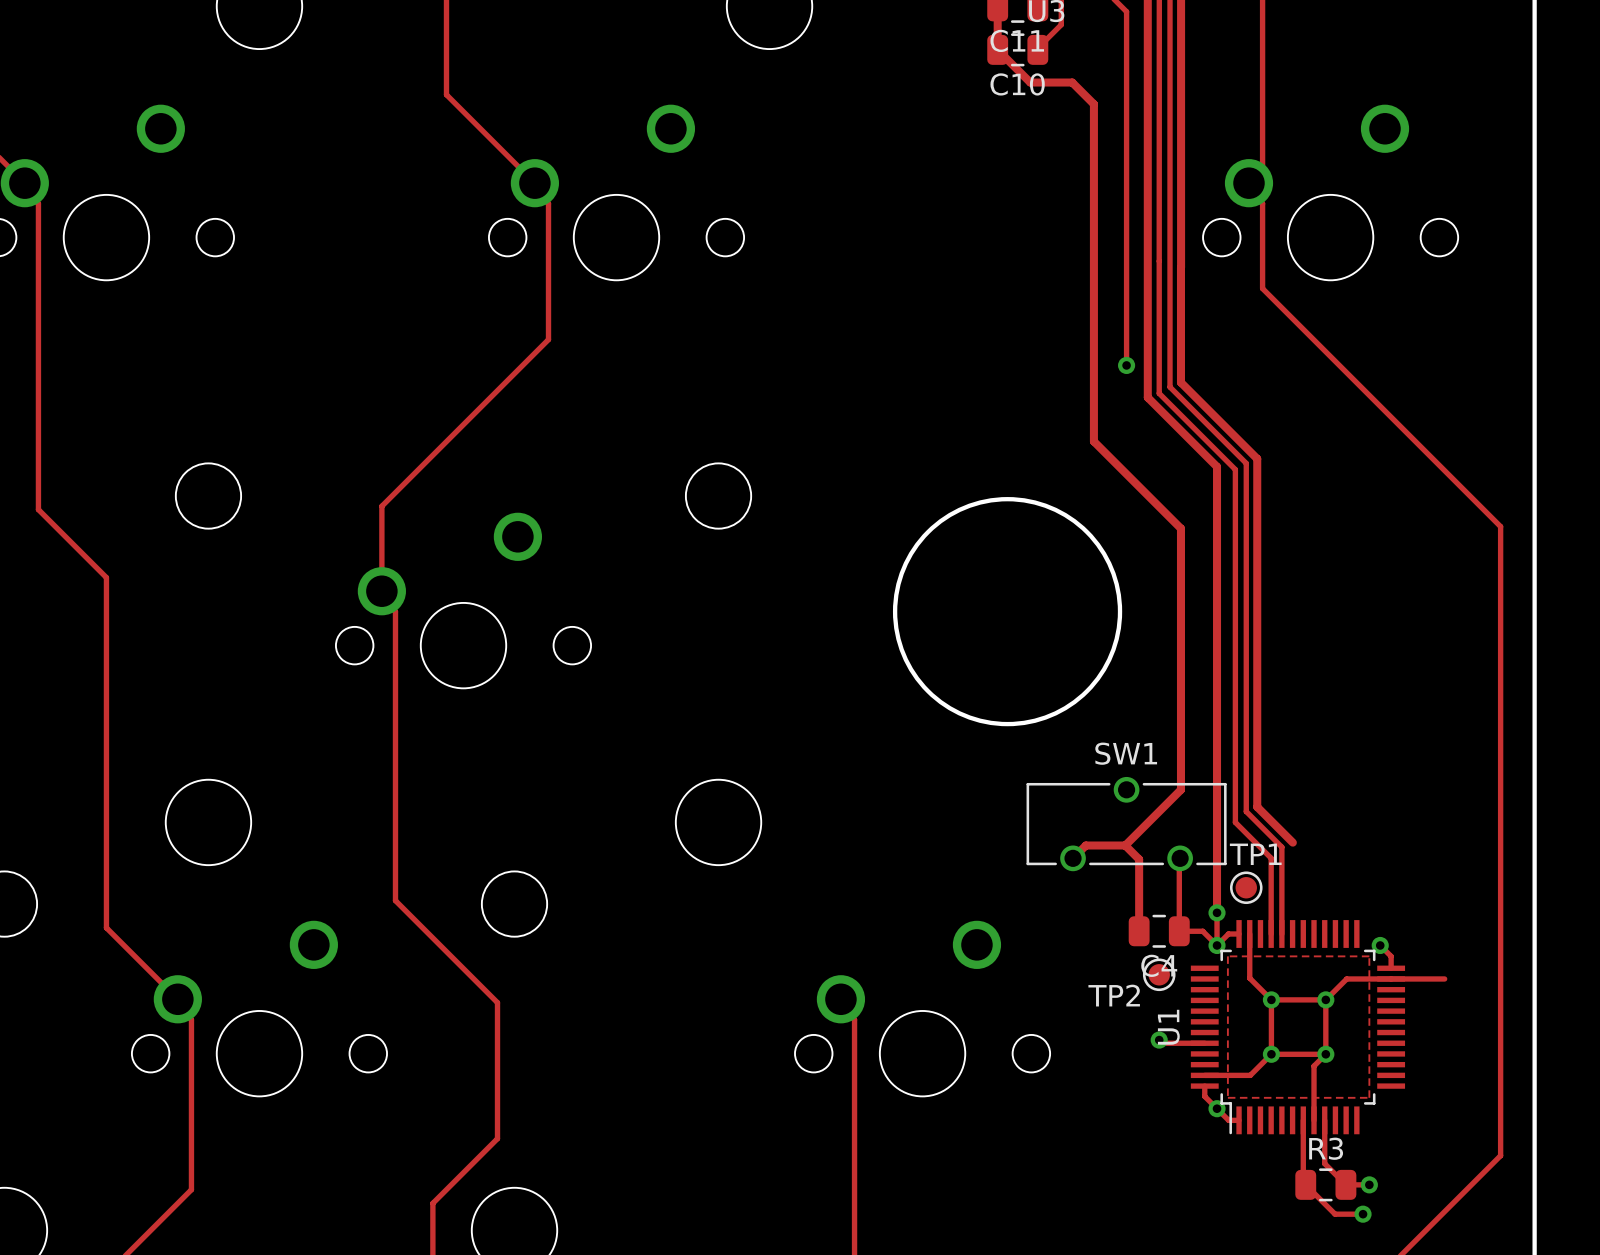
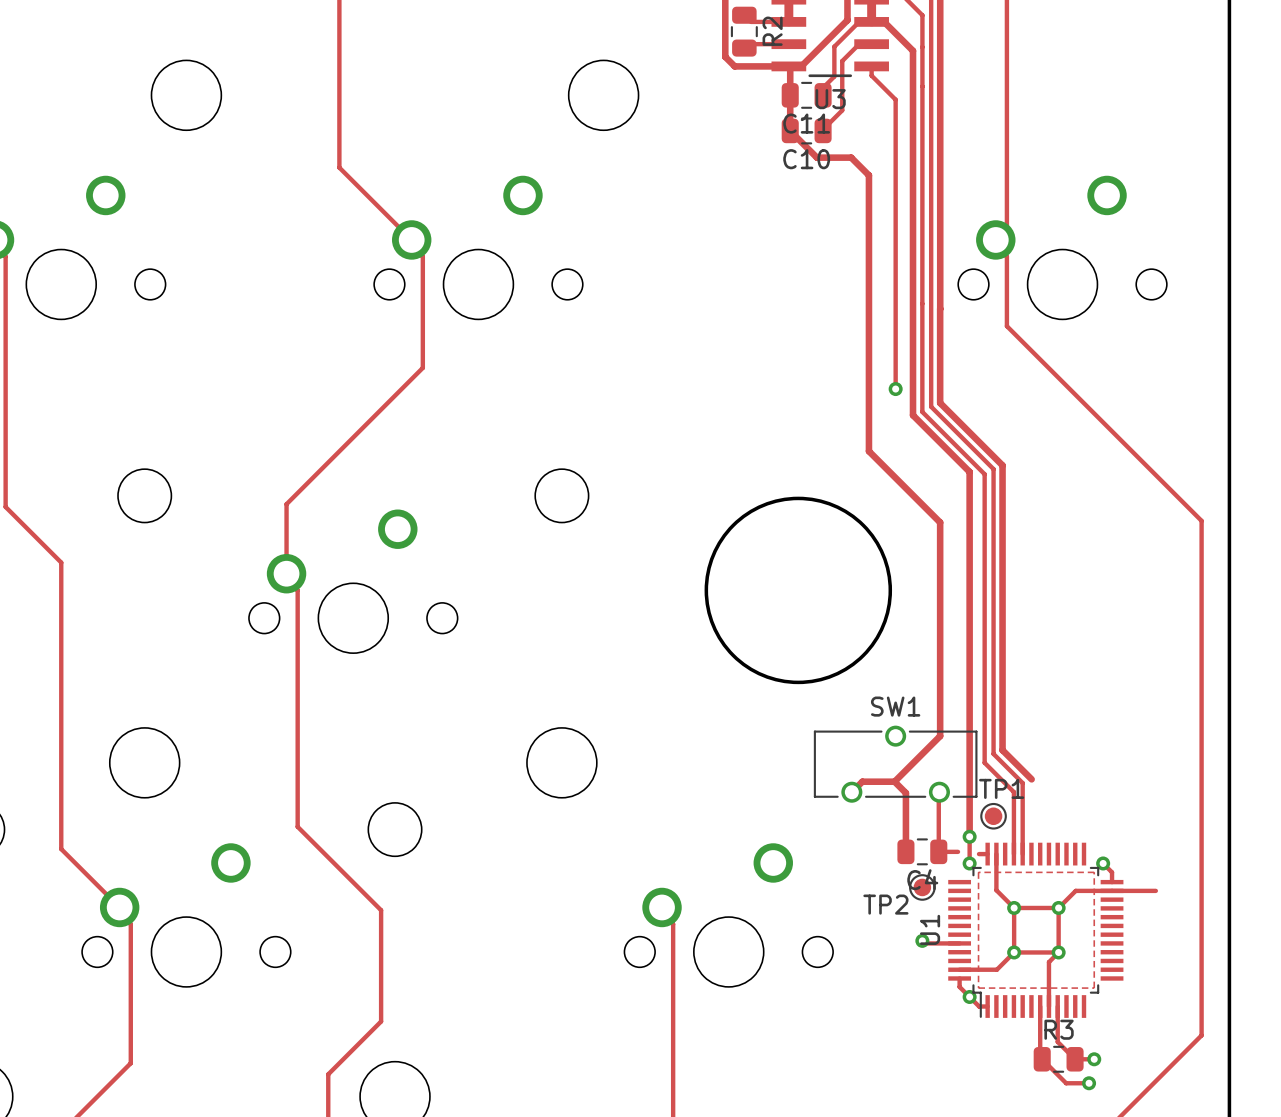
track: (1202, 931) (1217, 945) (1228, 934) -> none

